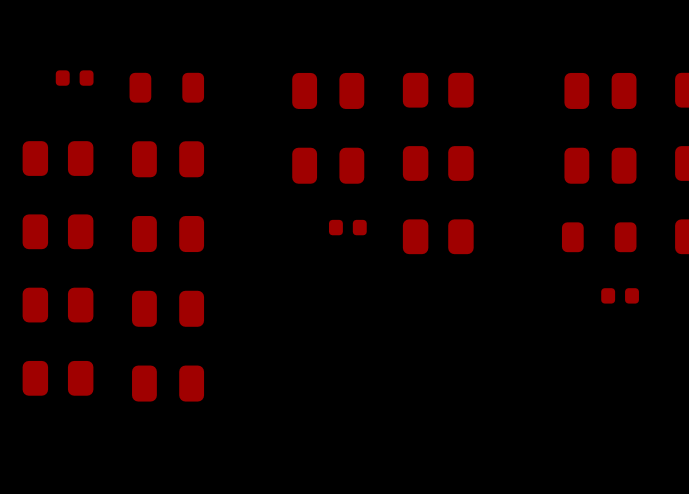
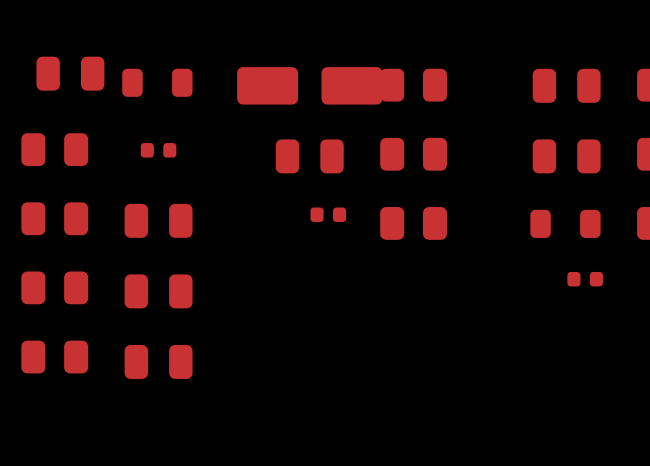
part footprint: [55, 70, 94, 86] -> [36, 56, 105, 91]
part footprint: [292, 72, 365, 109] -> [237, 67, 383, 105]
part footprint: [132, 141, 205, 178] -> [140, 143, 177, 158]

